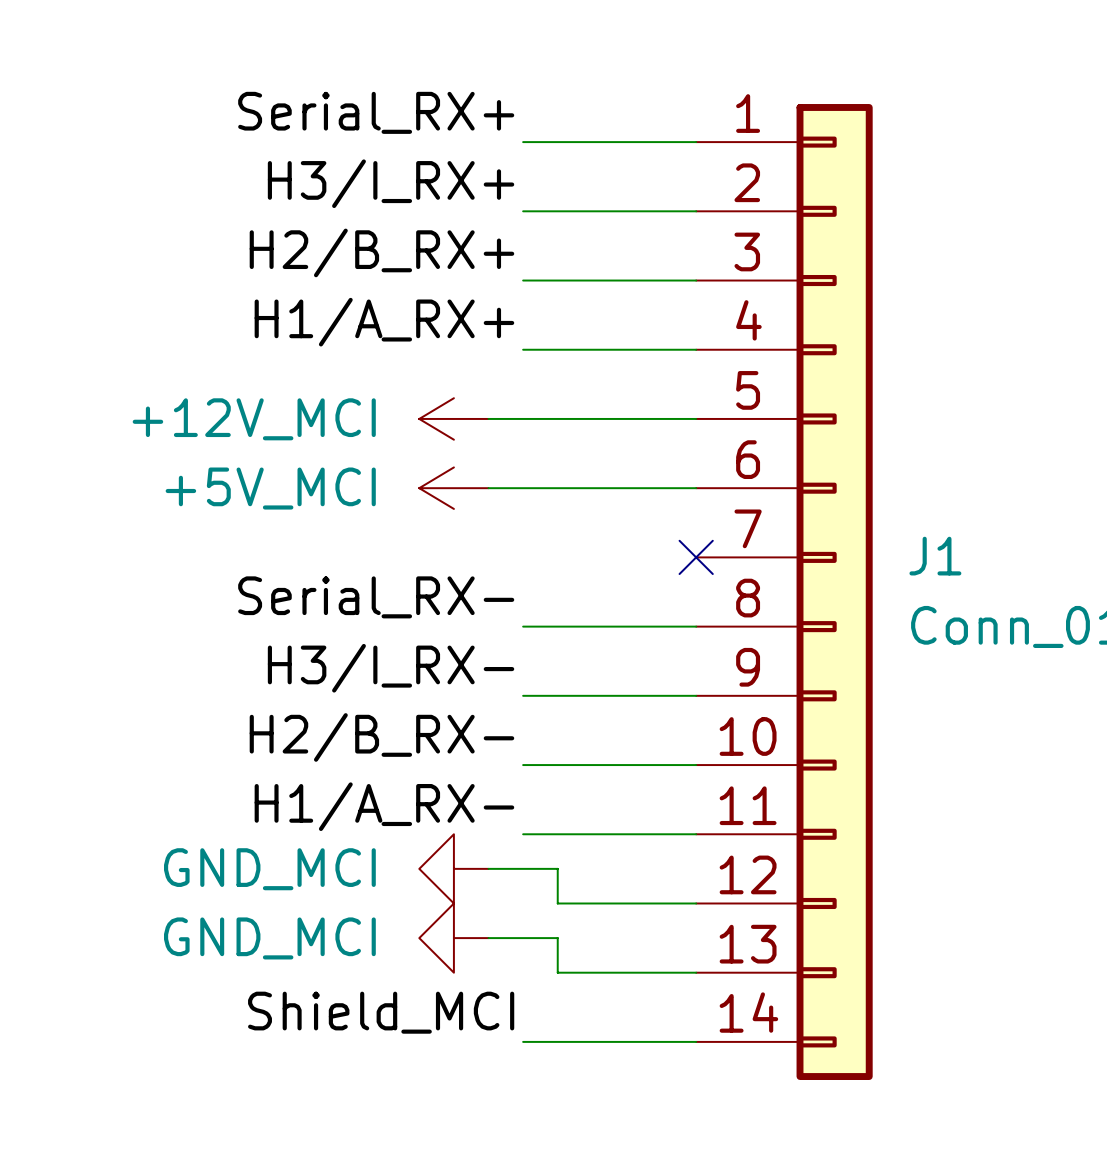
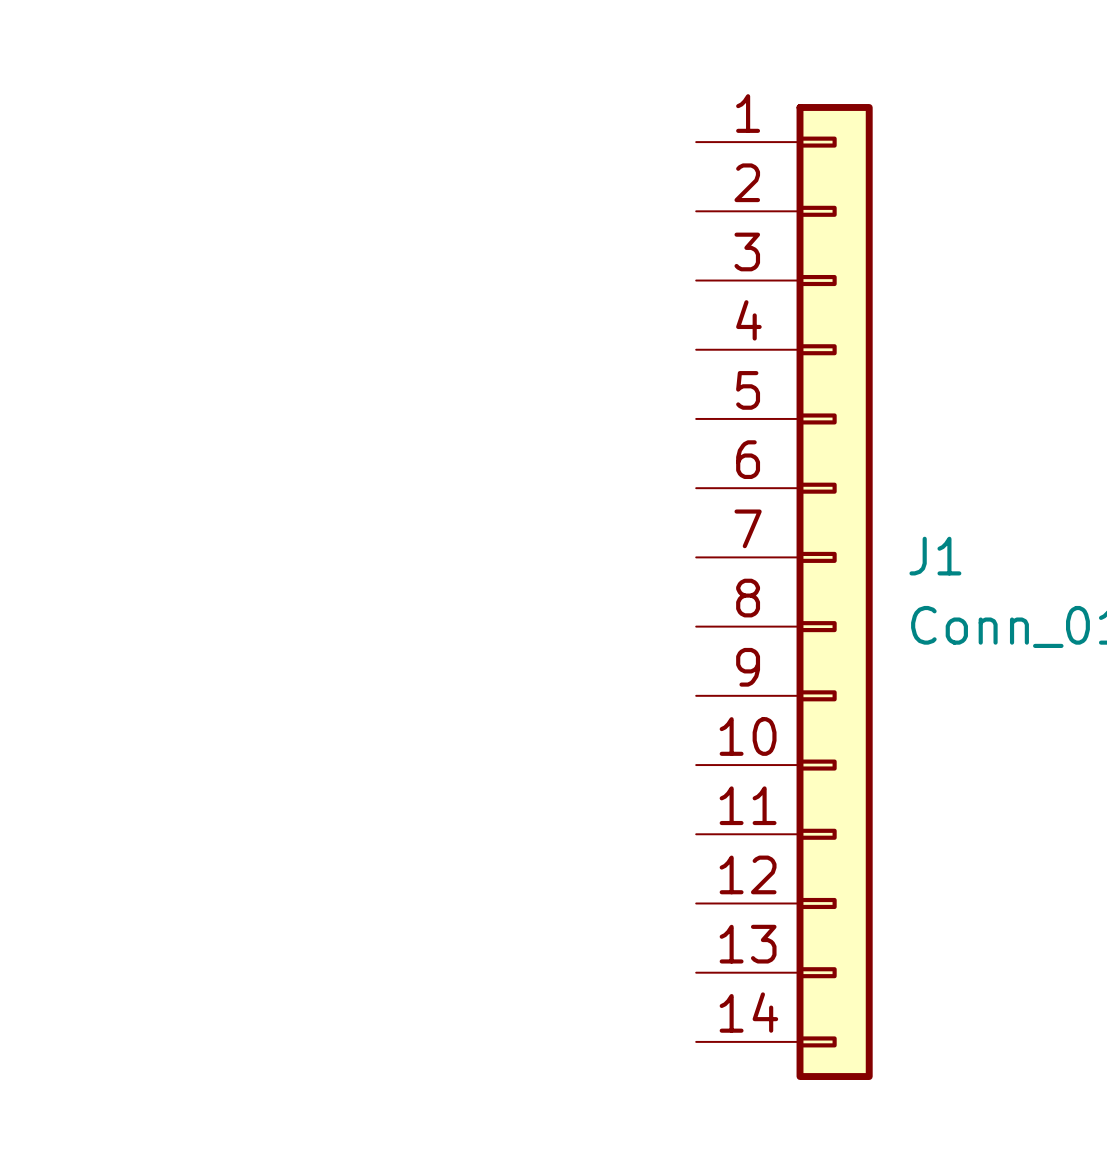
label: Serial_RX+ (376, 112) -> none
wire: (523, 142) (696, 142) -> none
label: H3/I_RX+ (391, 183) -> none
wire: (523, 211) (696, 211) -> none
label: H2/B_RX+ (381, 252) -> none
wire: (523, 280) (696, 280) -> none
label: H1/A_RX+ (384, 322) -> none
wire: (523, 349) (696, 349) -> none
power symbol: +12V_MCI (453, 418) -> none
wire: (488, 418) (696, 418) -> none
power symbol: +5V_MCI (453, 488) -> none
wire: (488, 488) (696, 488) -> none
no-connect mark: (696, 557) -> none
label: Serial_RX- (376, 597) -> none
wire: (523, 626) (696, 626) -> none
label: H3/I_RX- (391, 668) -> none
wire: (523, 695) (696, 695) -> none
label: H2/B_RX- (381, 737) -> none
wire: (523, 765) (696, 765) -> none
label: H1/A_RX- (384, 806) -> none
wire: (523, 834) (696, 834) -> none
power symbol: GND_MCI (453, 868) -> none
wire: (488, 868) (557, 868) (557, 903) (696, 903) -> none
power symbol: GND_MCI (453, 938) -> none
wire: (488, 938) (557, 938) (557, 972) (696, 972) -> none
label: Shield_MCI (381, 1012) -> none
wire: (523, 1041) (696, 1041) -> none

